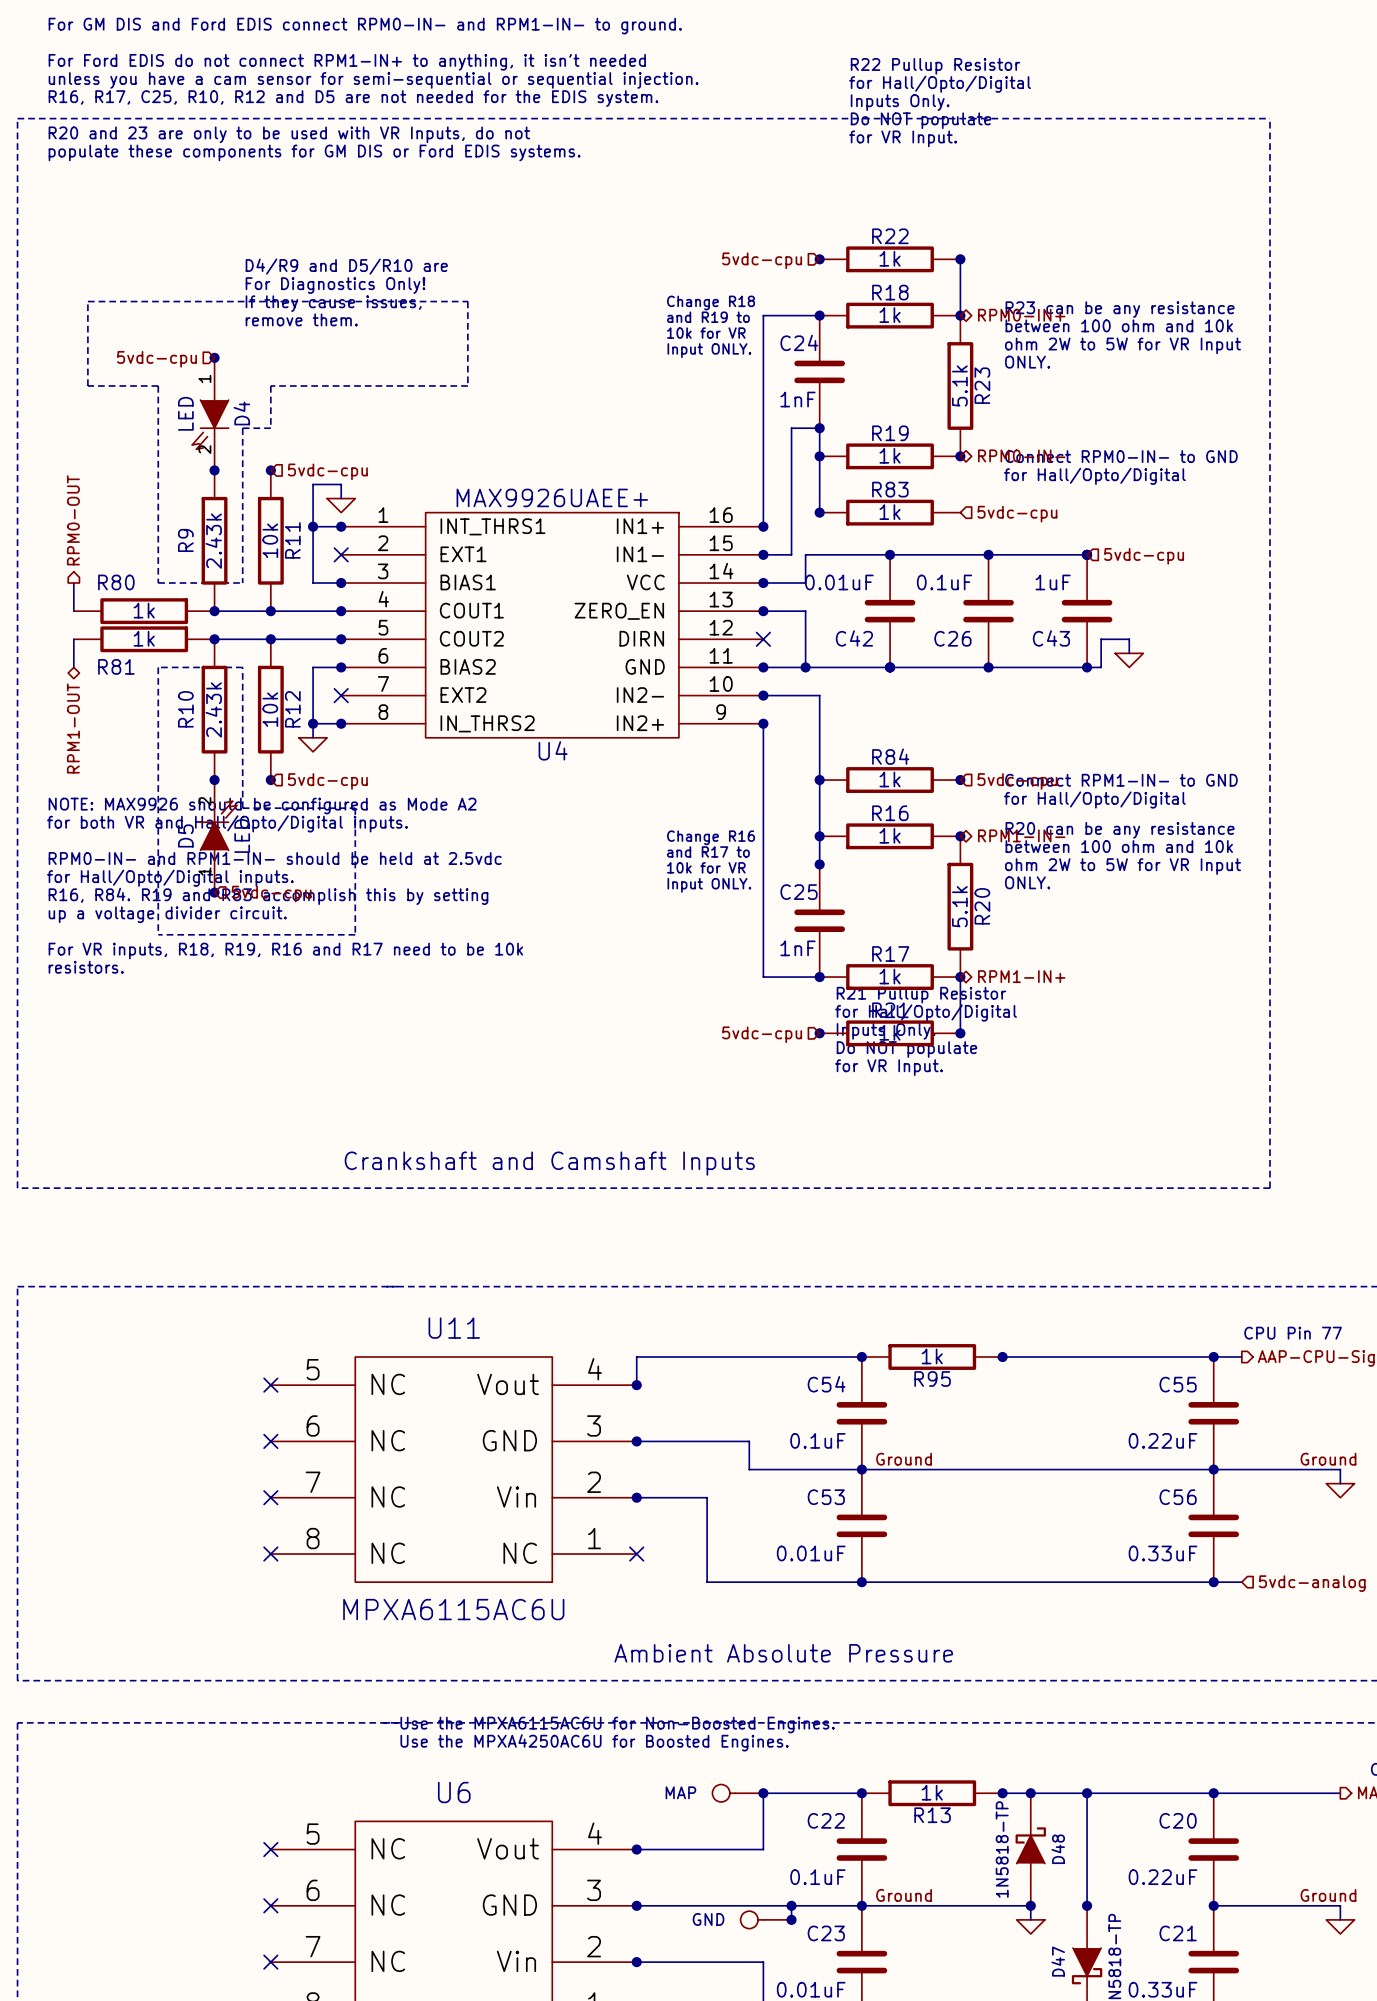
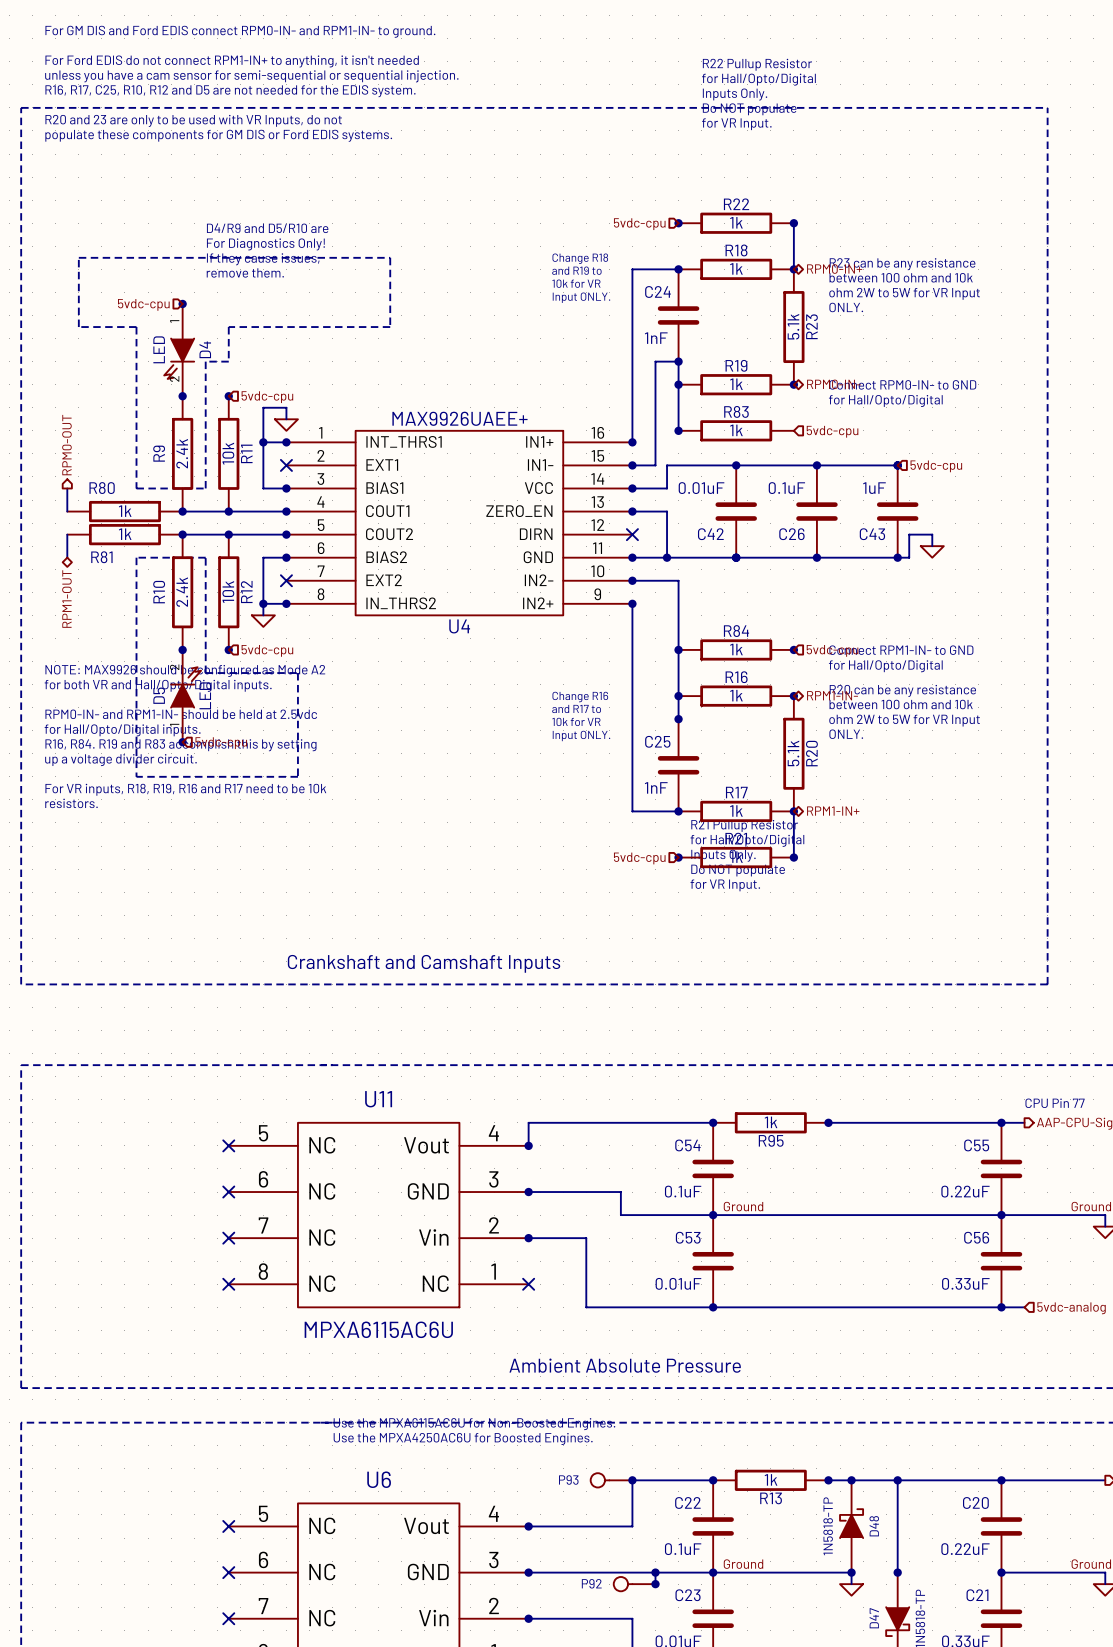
R9 value: 2.43k (213, 541) -> 2.4k (182, 453)
R10 value: 2.43k (213, 709) -> 2.4k (182, 592)
MAP name: MAP (680, 1792) -> P93 (568, 1480)
GND name: GND (708, 1919) -> P92 (591, 1583)

